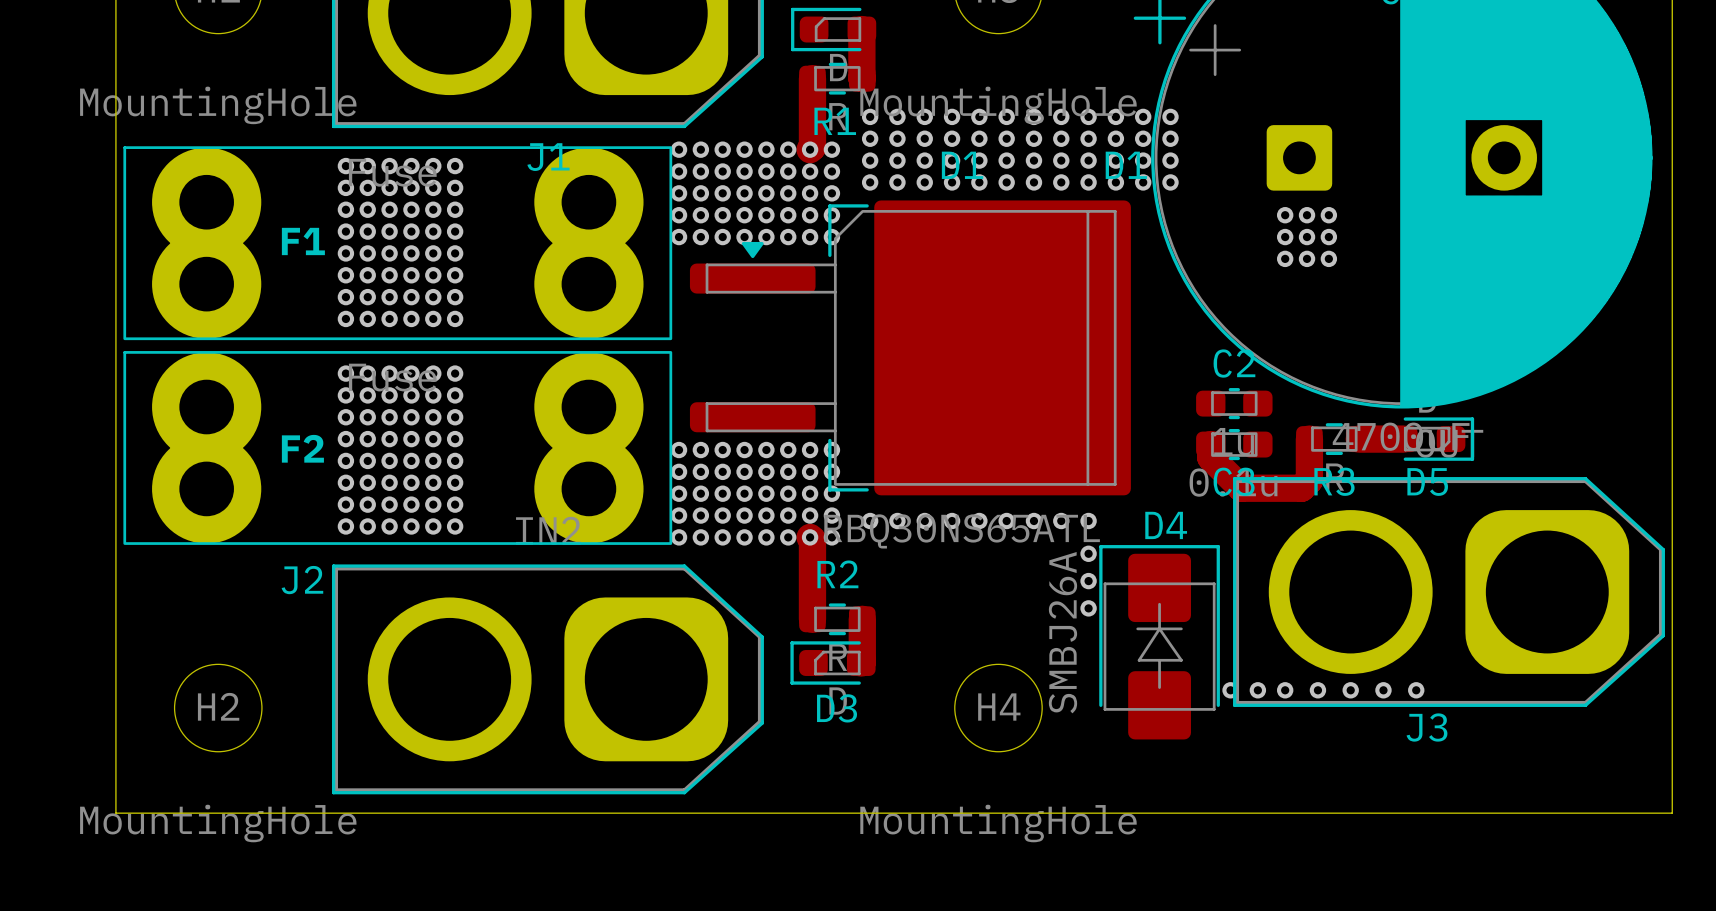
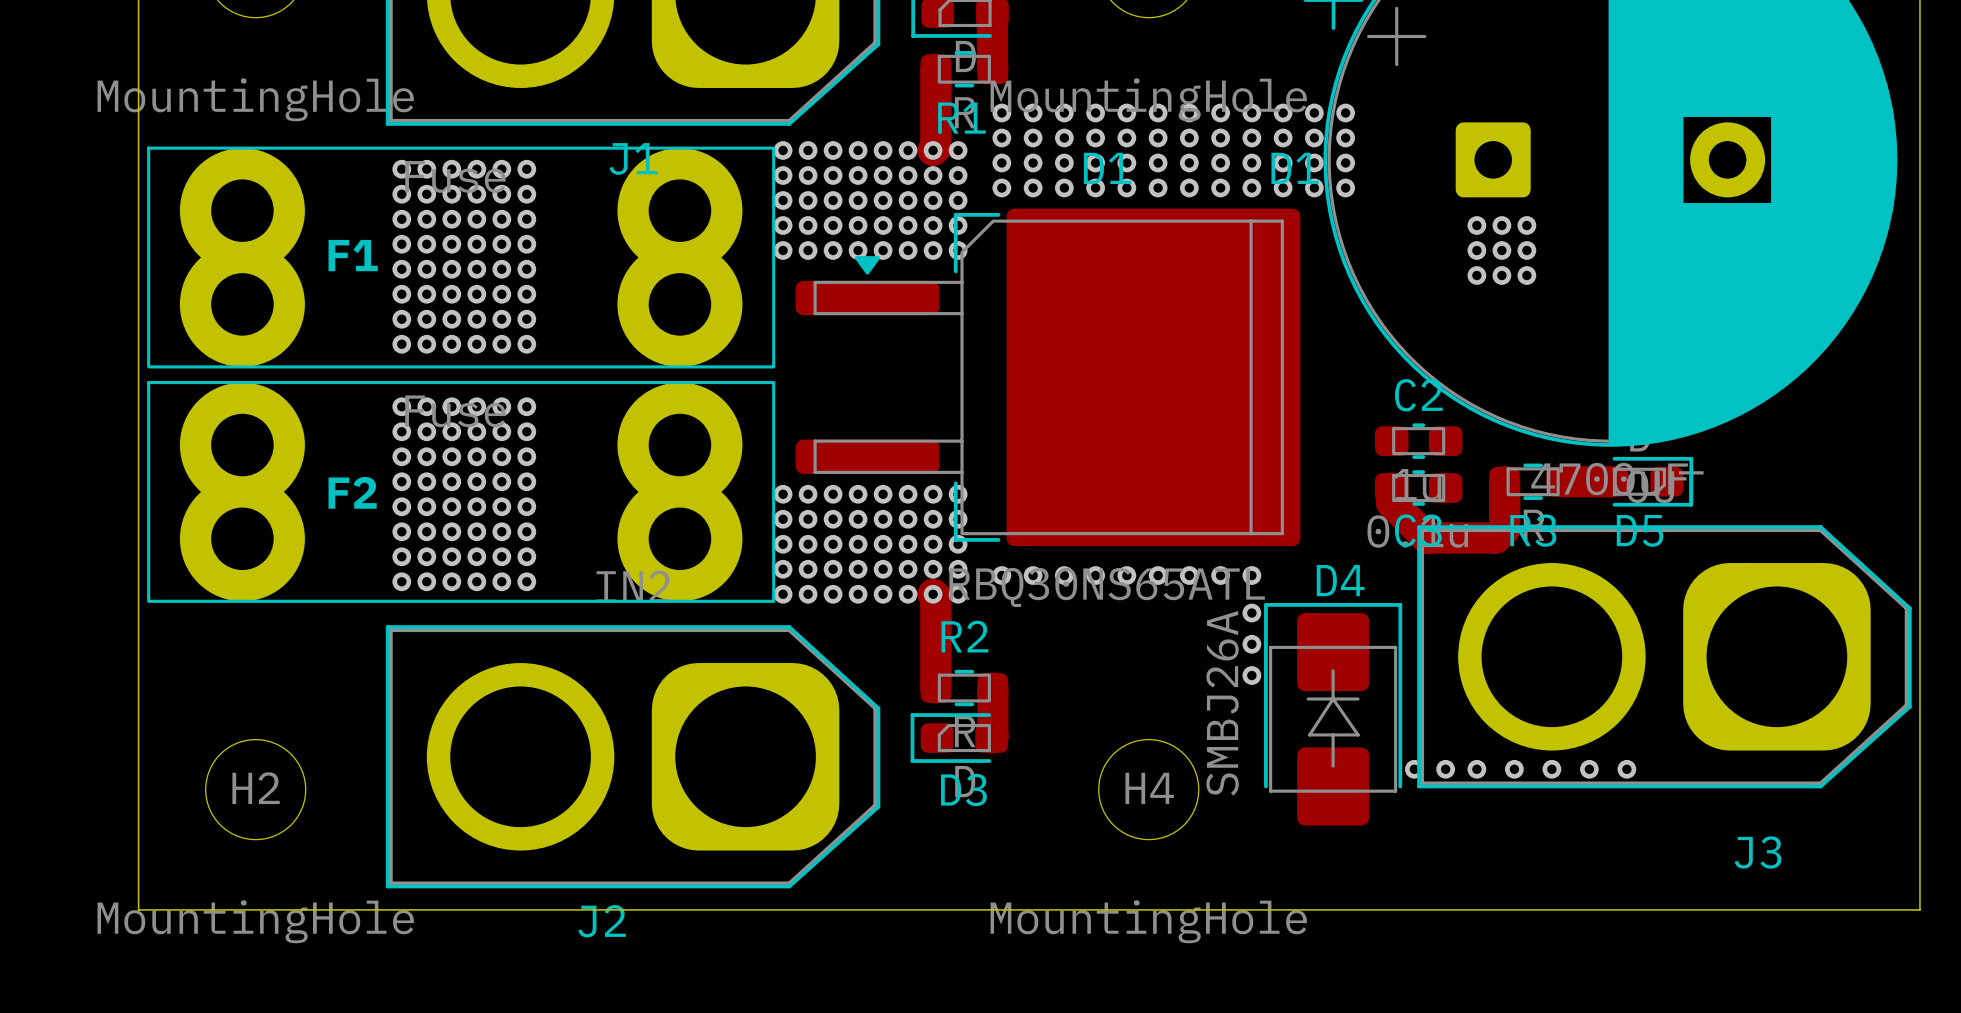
J2 name position: J2 (302, 580) -> J2 (602, 921)
J3 name position: J3 (1427, 727) -> J3 (1757, 852)

